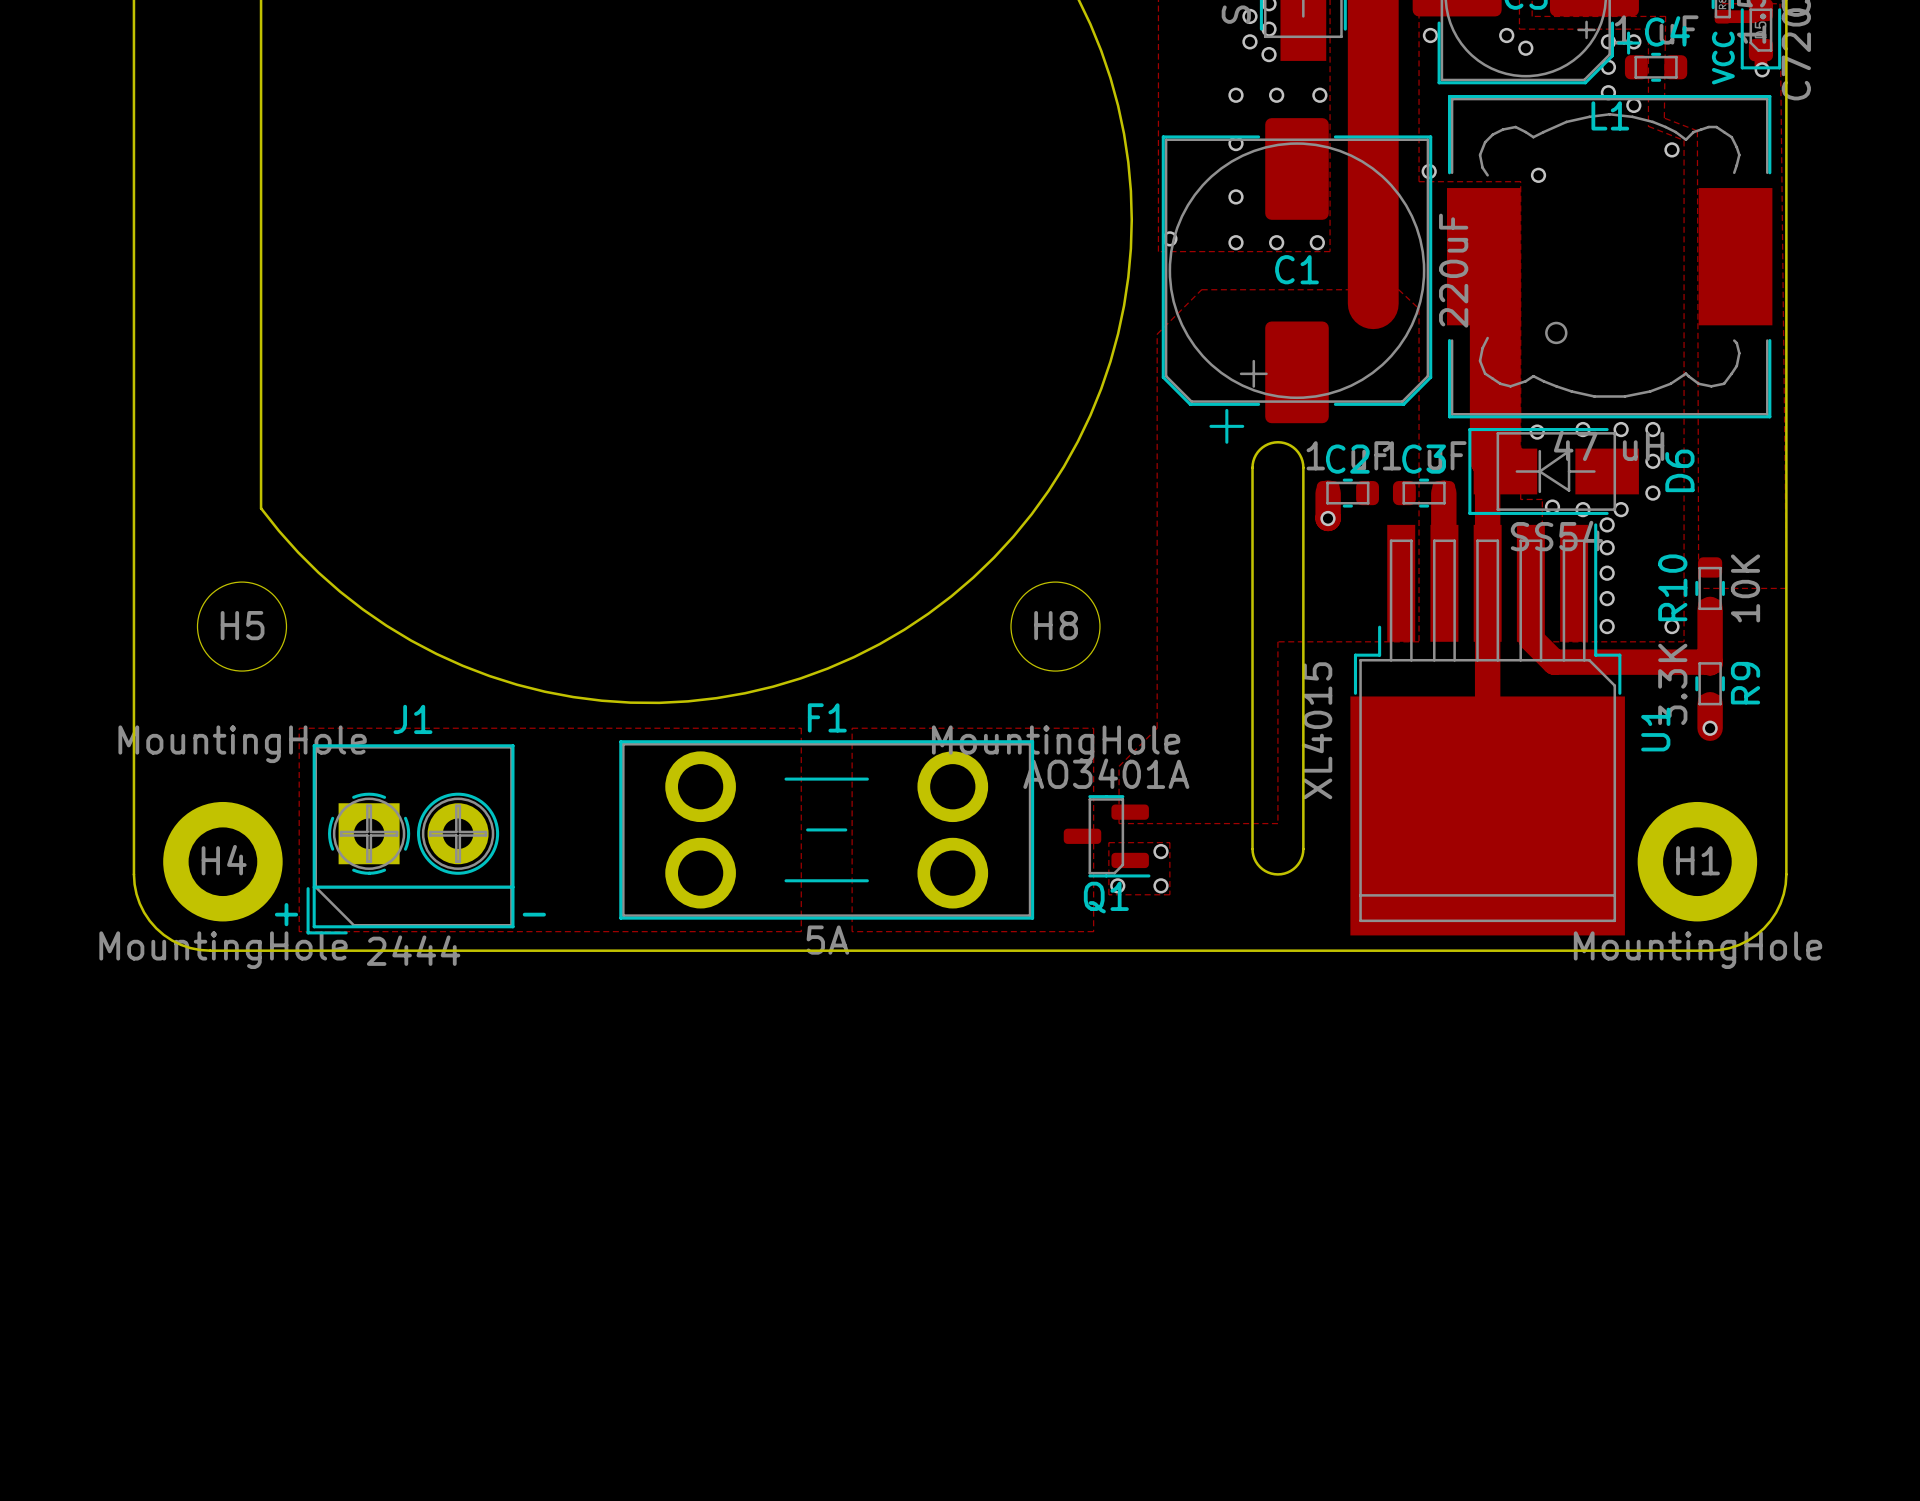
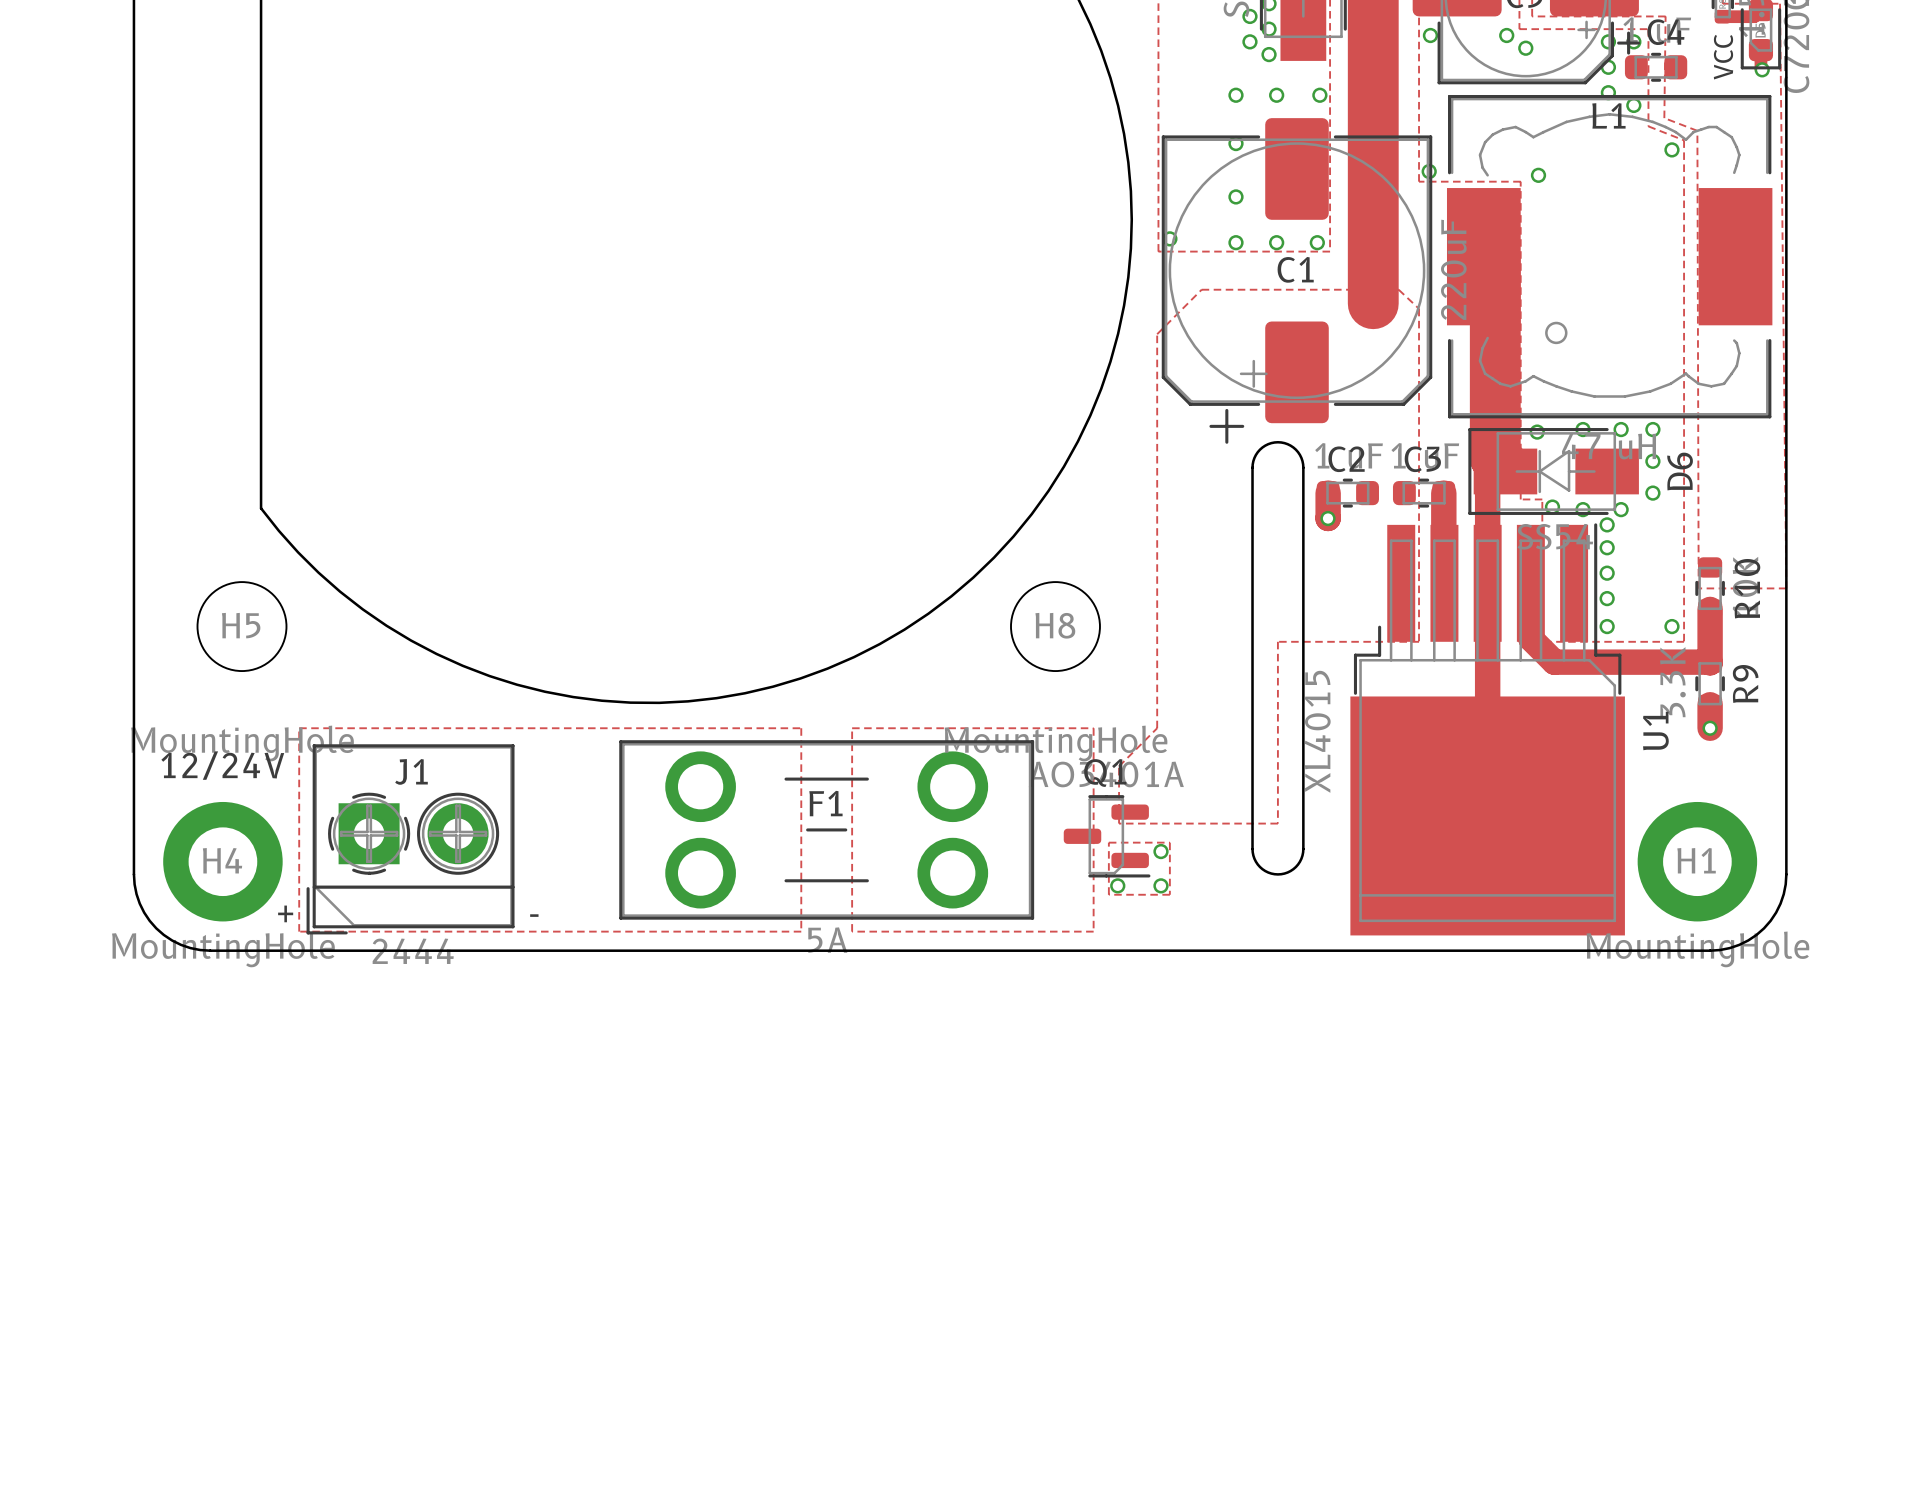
R10 name position: R10 (1672, 587) -> R10 (1747, 588)
F1 name position: F1 (827, 717) -> F1 (825, 803)
J1 name position: J1 (412, 719) -> J1 (411, 771)
text: none -> 12/24V (222, 765)
Q1 name position: Q1 (1106, 897) -> Q1 (1105, 773)

